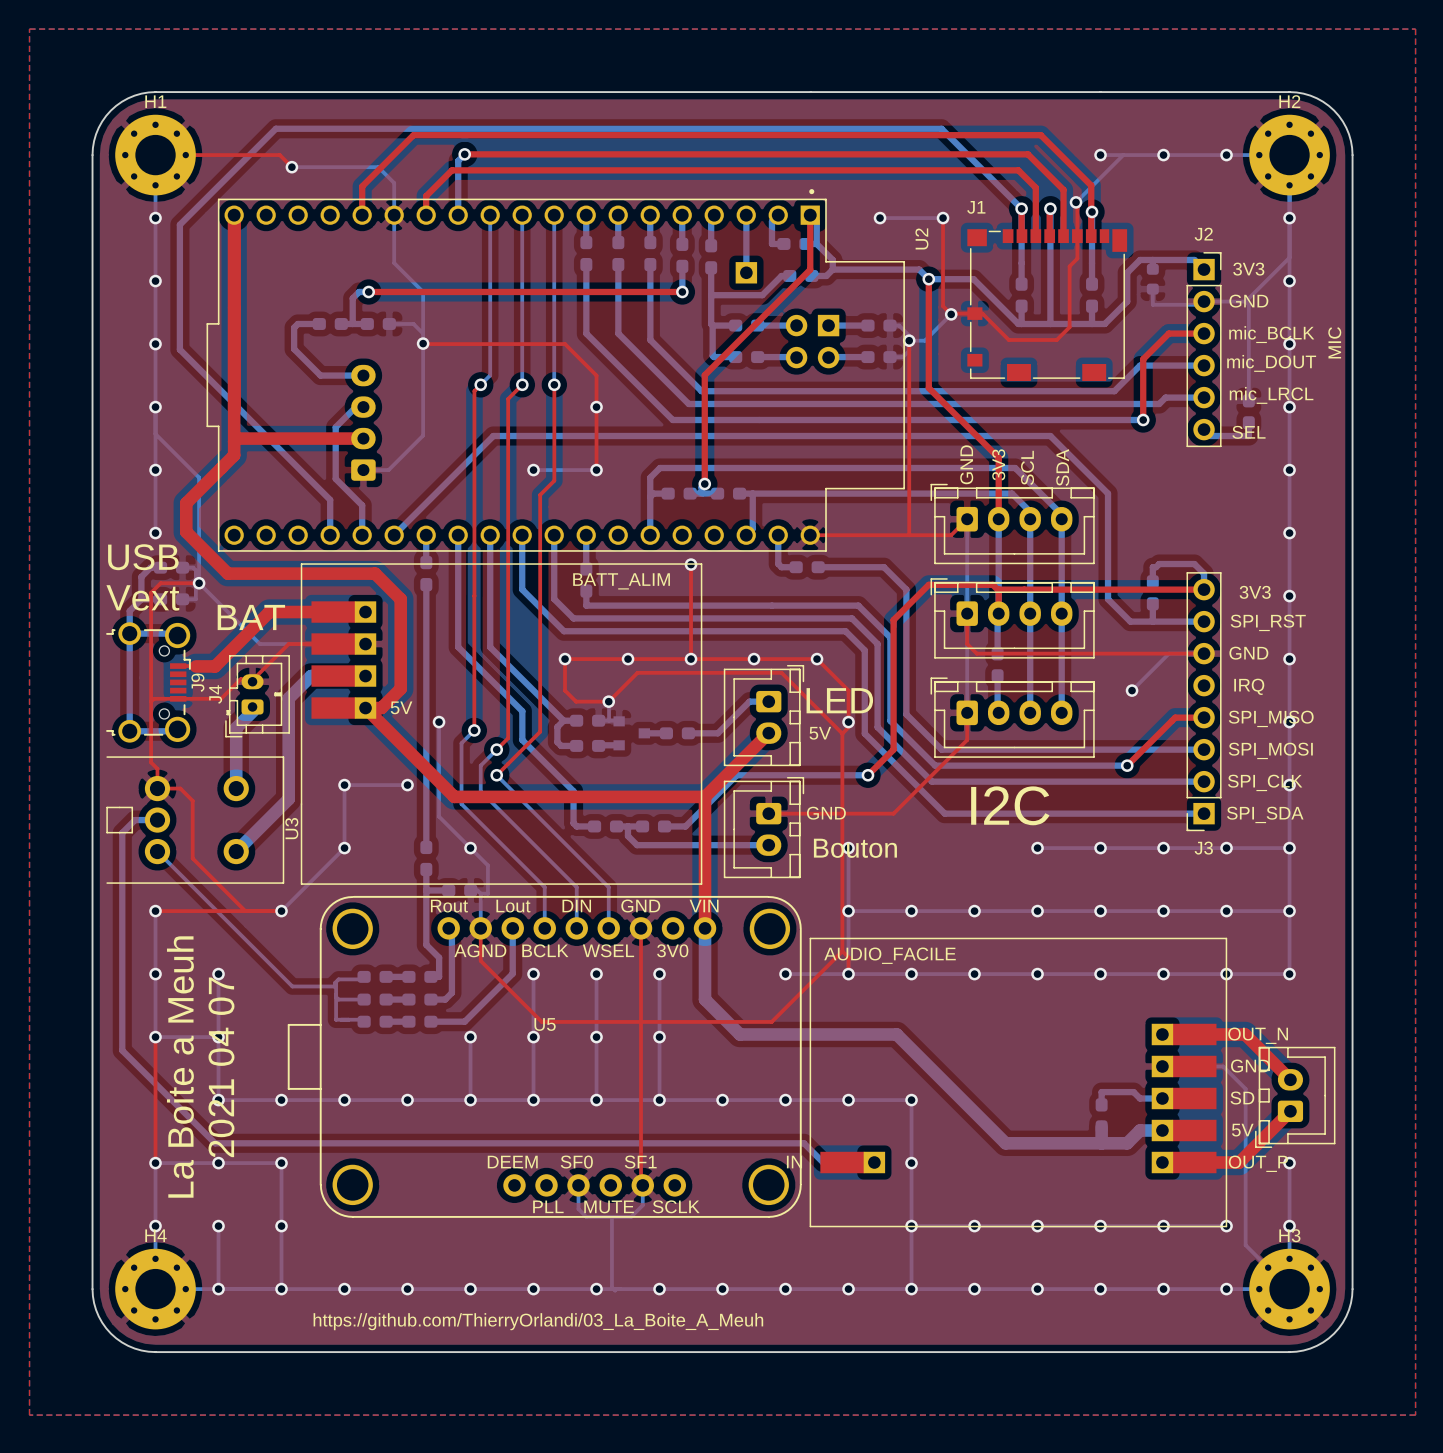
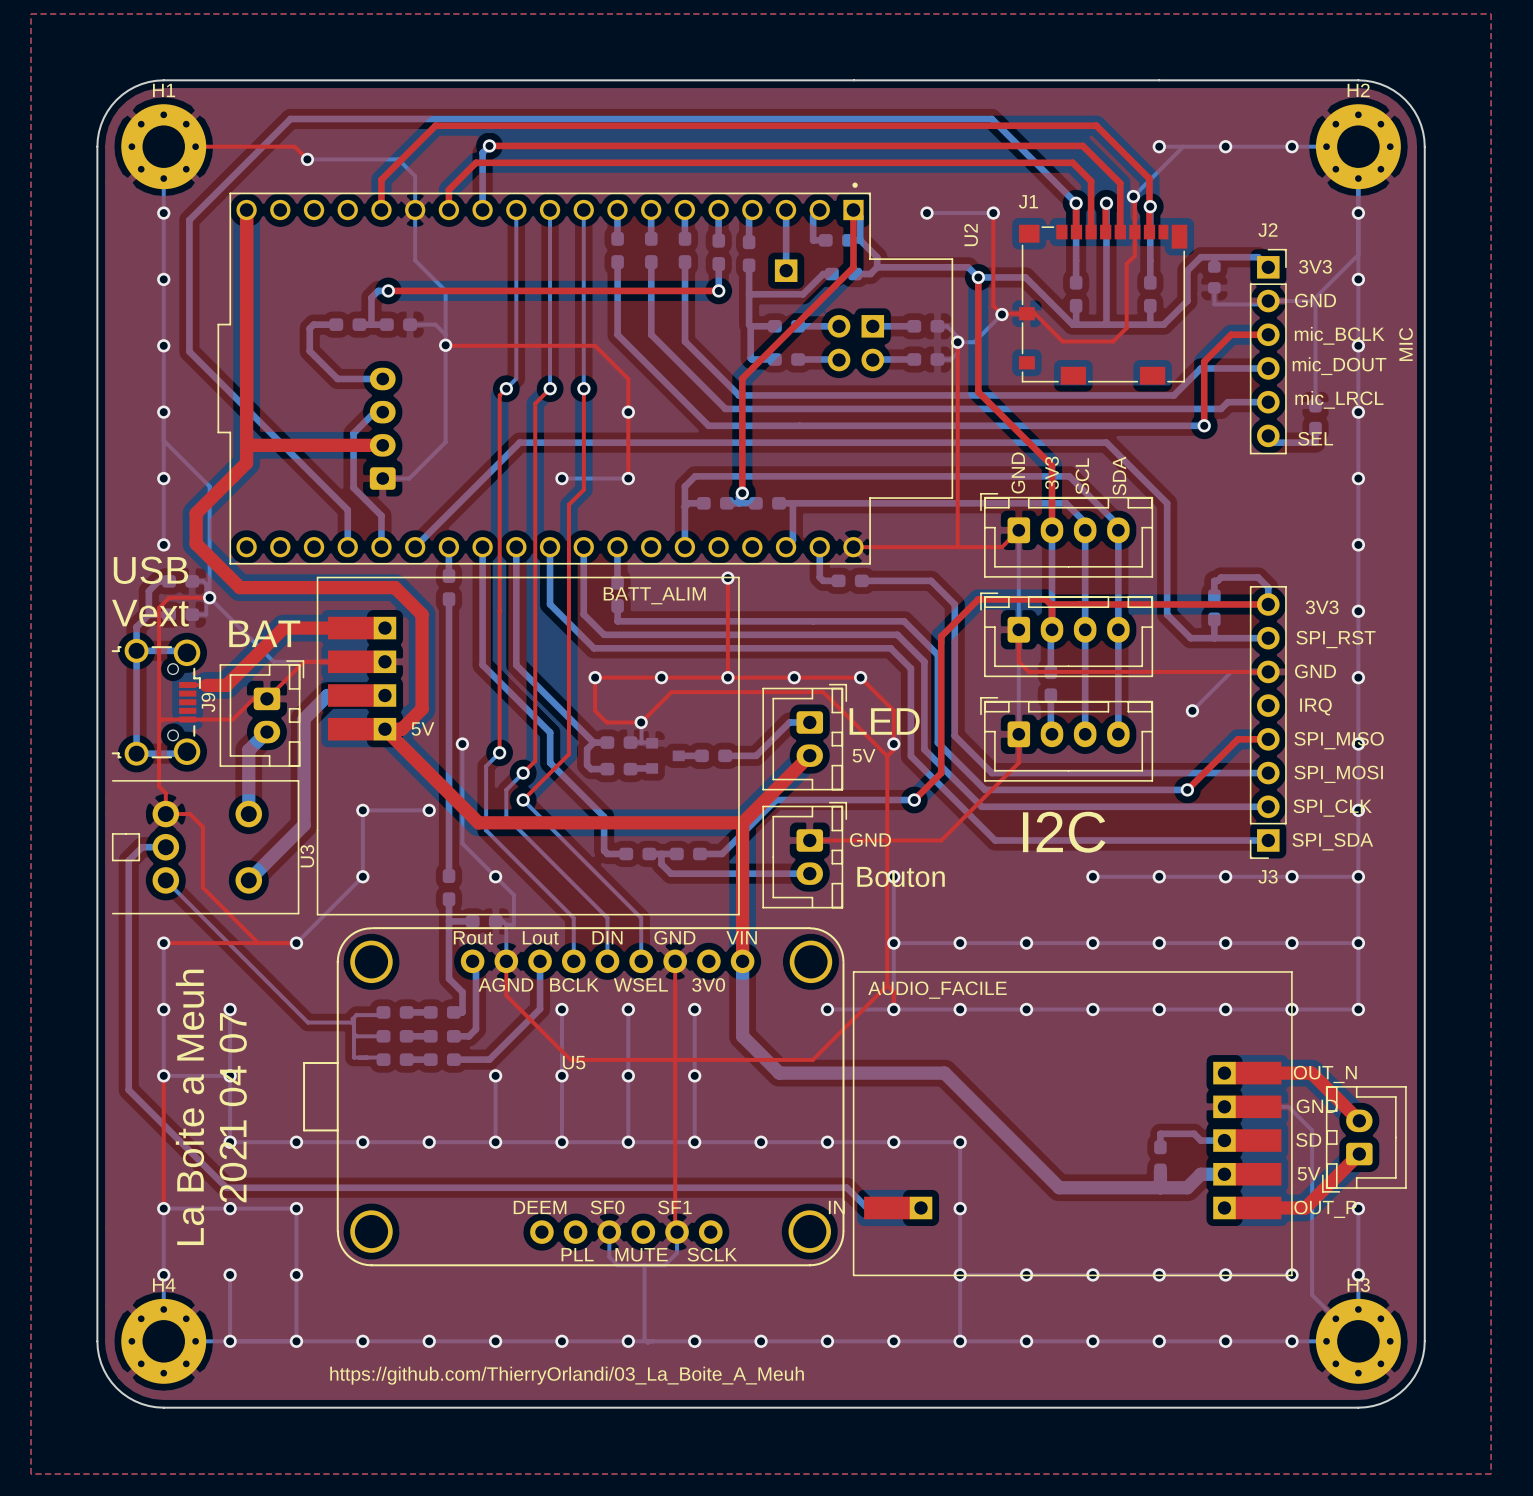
part: none -> (261, 713)
J4: (257, 696) -> none

